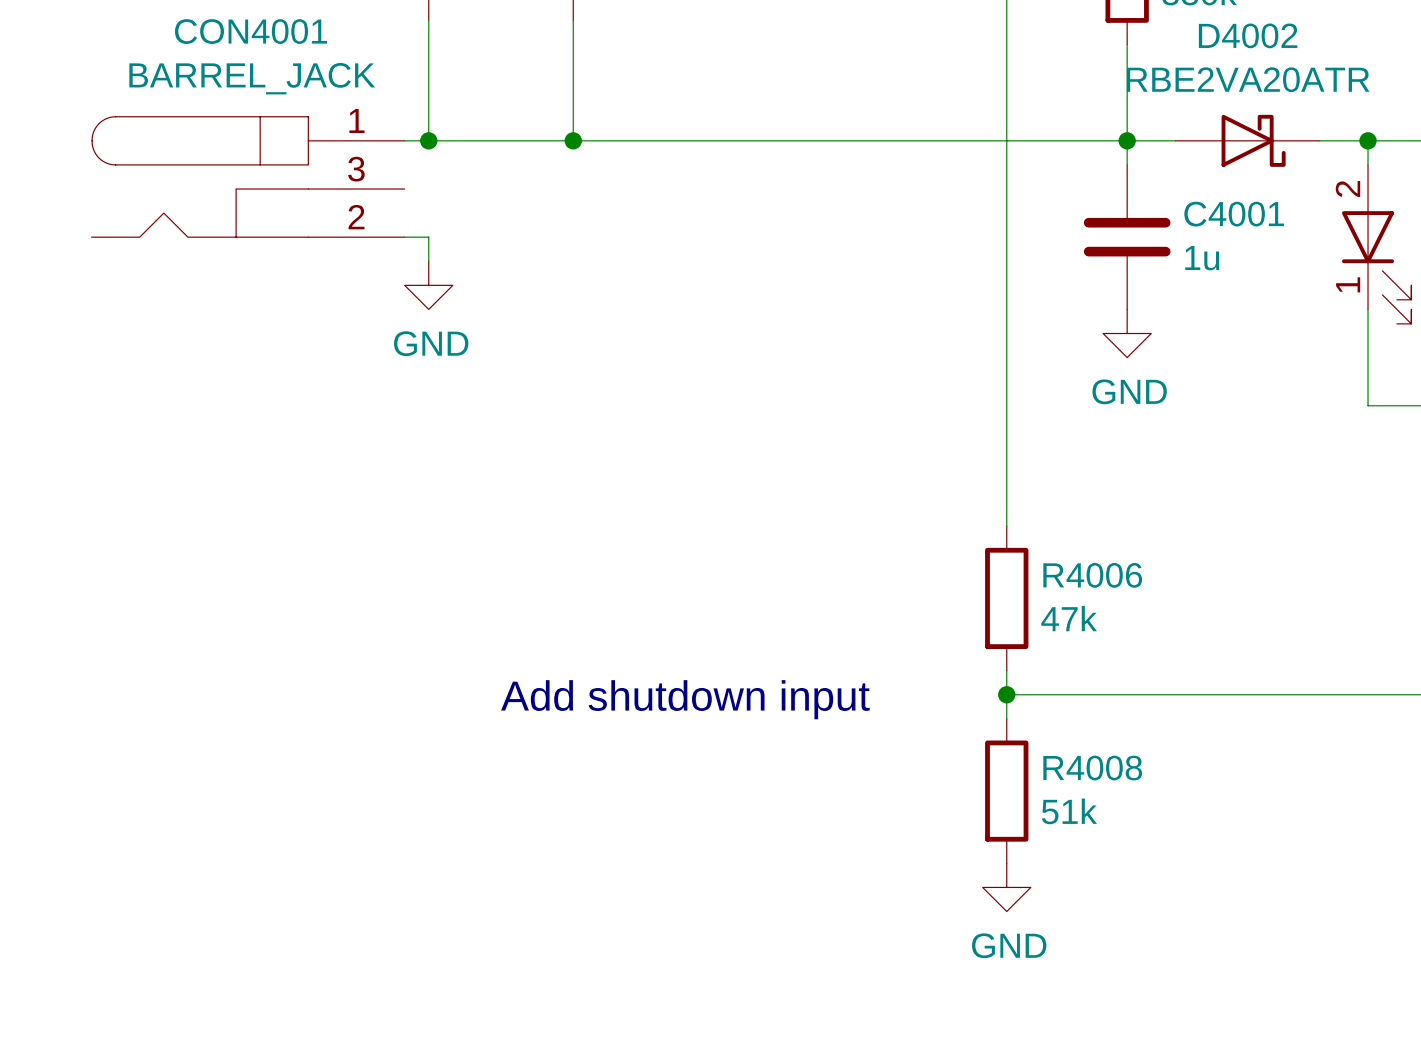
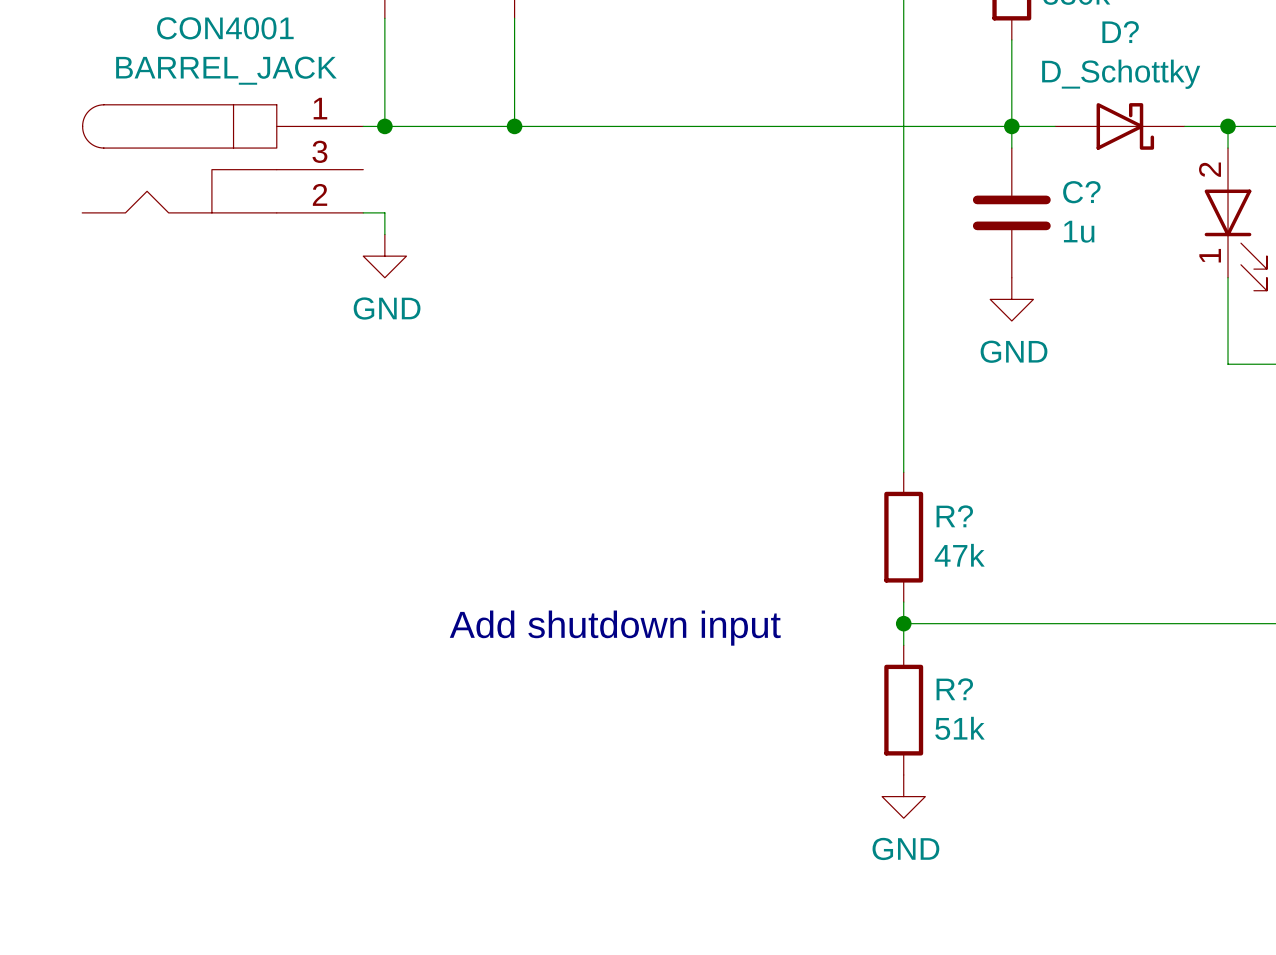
D4002 name: D4002 (1248, 35) -> D? (1120, 32)
D4002 value: RBE2VA20ATR (1248, 79) -> D_Schottky (1121, 74)
C4001 name: C4001 (1234, 214) -> C? (1081, 192)
R4006 name: R4006 (1092, 575) -> R? (954, 516)
R4008 name: R4008 (1092, 768) -> R? (954, 689)

